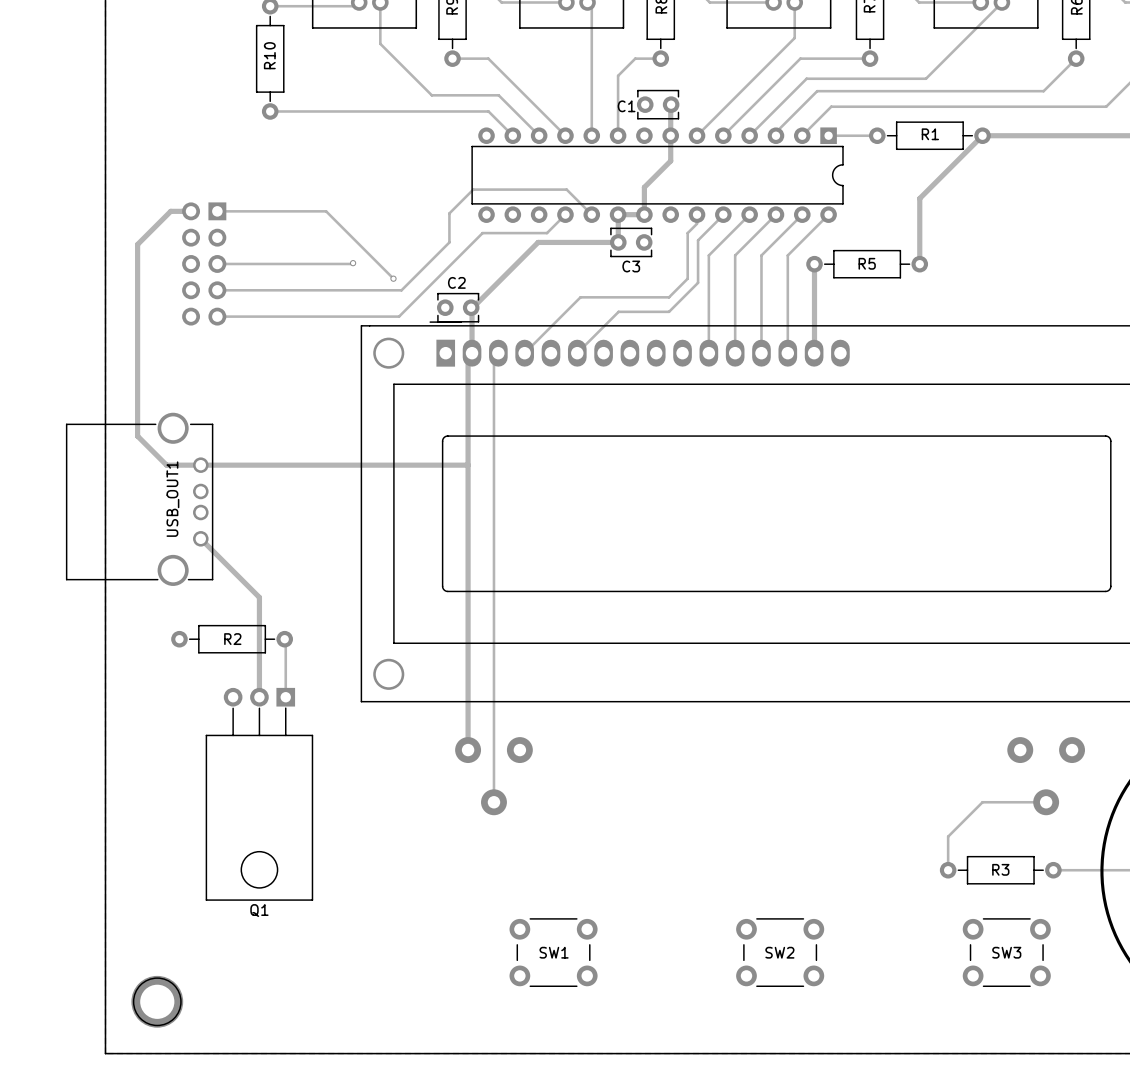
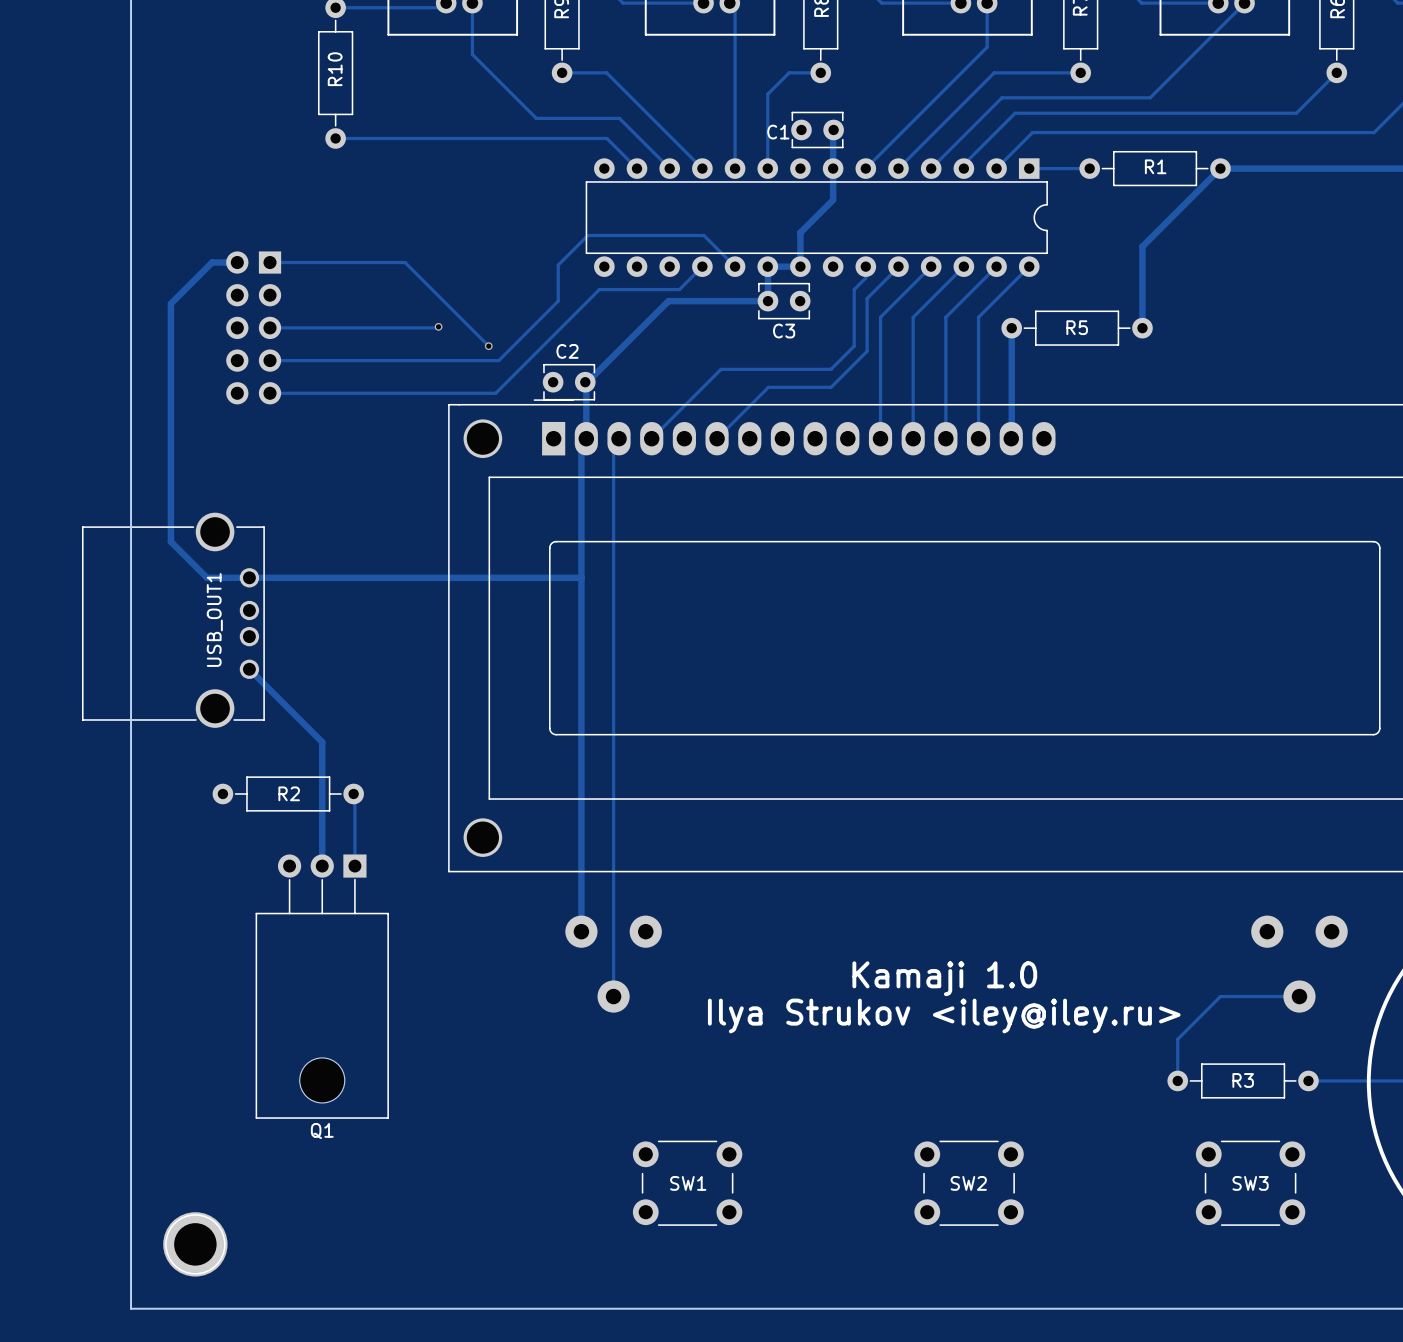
text: none -> Kamaji 1.0 (944, 978)
text: none -> Ilya Strukov <iley@iley.ru> (944, 1015)

